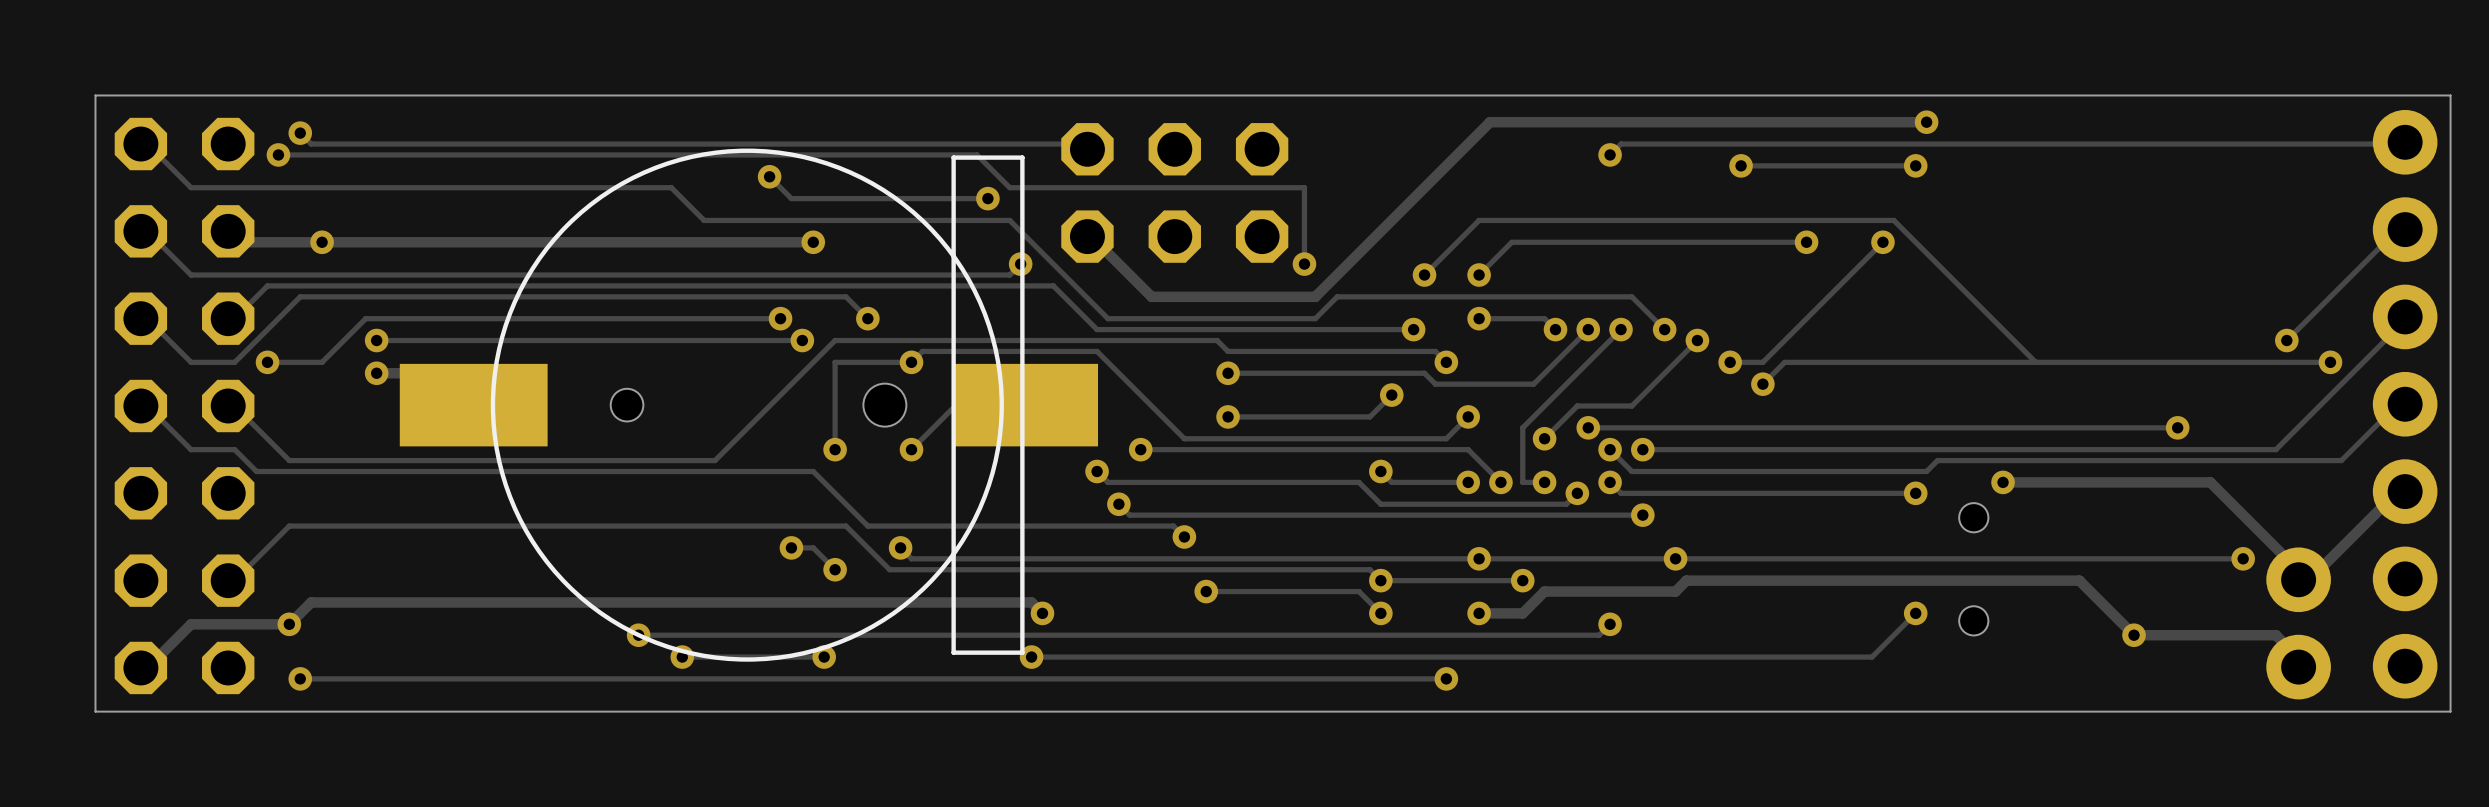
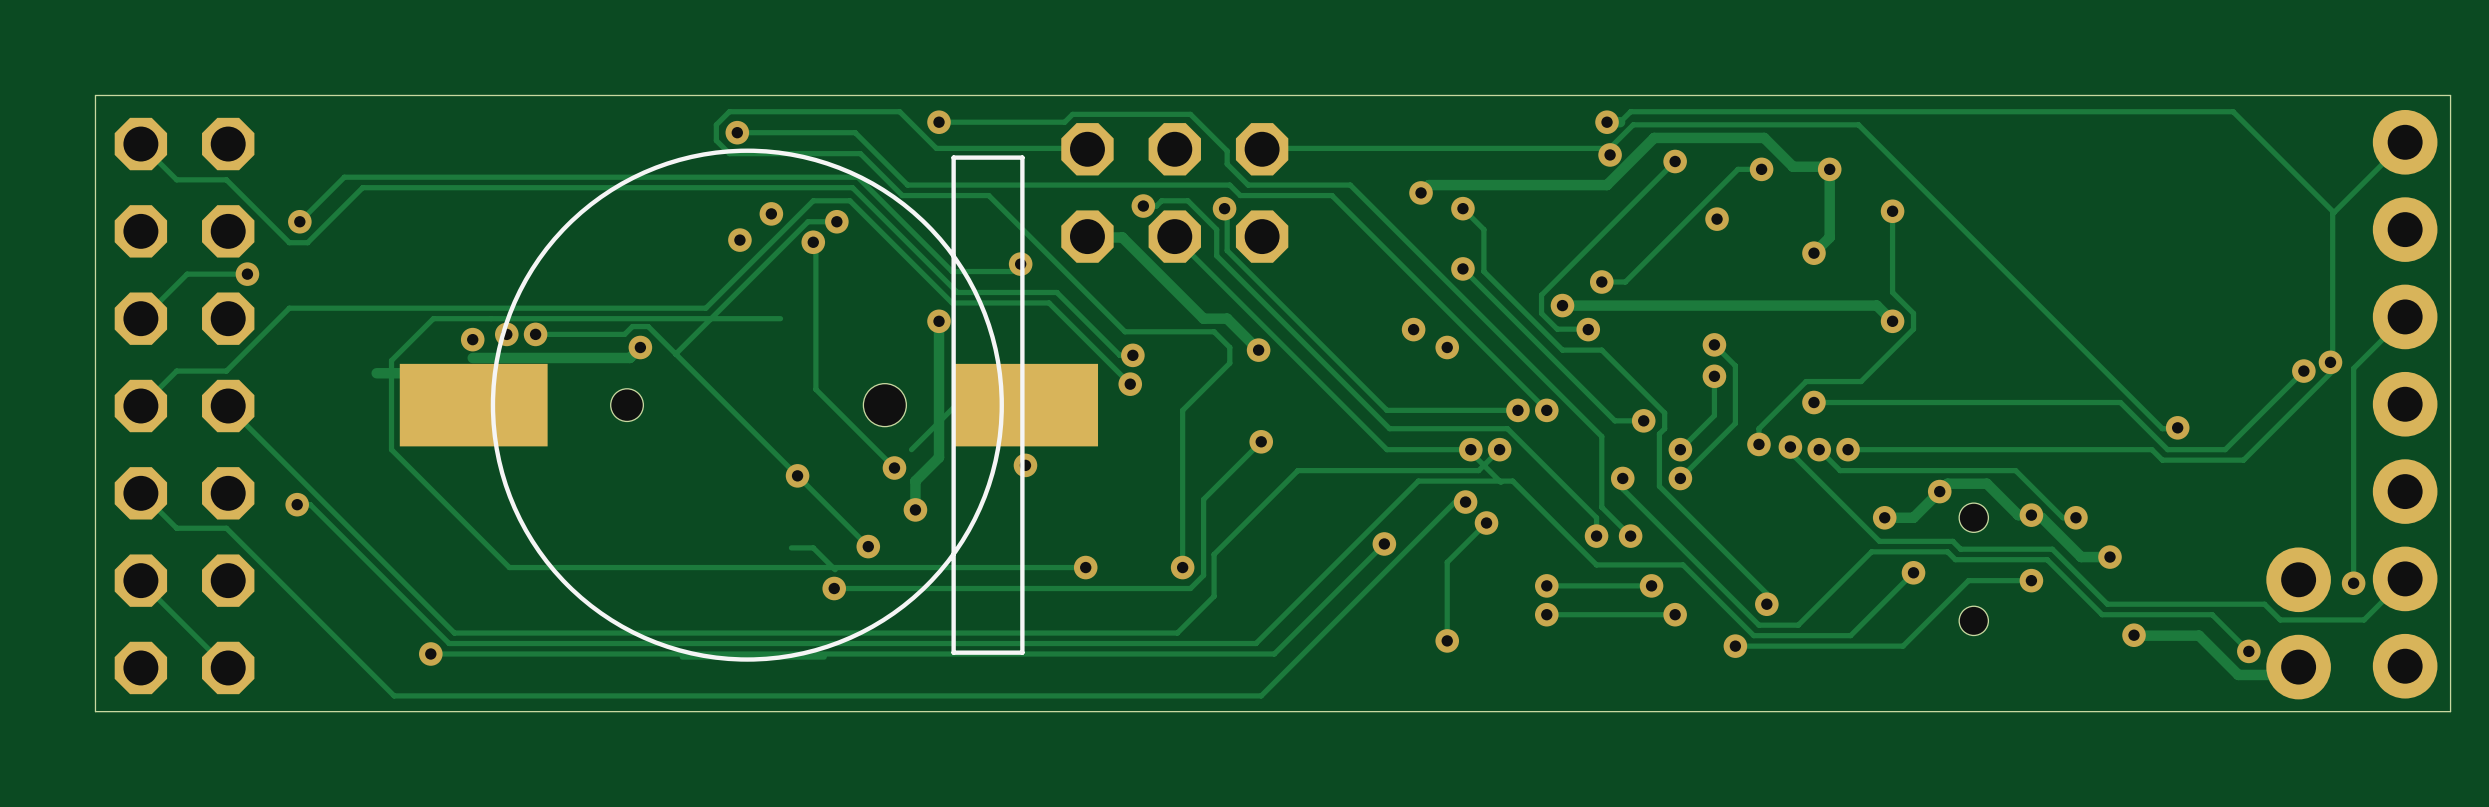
track: none -> (939, 122) (1064, 122) (1072, 114) (1190, 114) (1227, 151) (1227, 164) (1248, 185) (1350, 185) (1601, 436) (1601, 507) (1630, 536)
via: none -> (939, 122)
track: (1607, 122) (1490, 122) (1315, 296) (1151, 296) (1097, 242) (1087, 236) -> (1203, 318) (1122, 237) (1087, 236)
via: none -> (1607, 122)
track: (1926, 122) (1620, 122) -> (2333, 212) (2233, 111) (1630, 111) (1620, 122)
via: (1926, 122) -> none
track: none -> (737, 132) (855, 132) (907, 185) (1229, 185) (1240, 195) (1331, 195) (1546, 410)
via: none -> (737, 132)
track: (300, 133) (311, 144) (1086, 144) (1087, 149) -> (1182, 567) (1182, 410) (1229, 363) (1229, 347) (1214, 331) (1125, 331) (988, 195) (902, 195) (860, 153) (729, 153) (716, 140) (716, 124) (729, 111) (899, 111) (936, 148) (1087, 149)
via: (300, 133) -> none
track: (2405, 142) (2395, 144) (1621, 144) (1610, 154) -> (2405, 142) (2332, 213) (2332, 371) (2243, 460) (2162, 460) (2151, 449)
track: (140, 144) (147, 144) (191, 187) (362, 187) -> (140, 144) (176, 179) (226, 179) (289, 242) (307, 242) (362, 187)
track: none -> (1262, 149) (1609, 148) (1633, 124) (1858, 124) (2162, 428) (2175, 428)
track: (278, 154) (977, 154) (1009, 187) (1304, 187) (1304, 264) -> none
via: (278, 154) -> none
track: none -> (1675, 161) (1541, 295) (1541, 313) (1557, 329) (1596, 329)
via: none -> (1675, 161)
via position: (1741, 165) -> (1761, 169)
track: (1915, 165) (1741, 165) -> none
via: (1915, 165) -> none
track: none -> (1761, 169) (1738, 169) (1625, 282) (1601, 282)
via: none -> (1829, 169)
track: (769, 176) (791, 198) (987, 198) -> none
via: (769, 176) -> none
track: (671, 187) (704, 220) (1009, 220) (1107, 318) (1203, 318) -> (671, 187) (852, 187) (957, 292) (1056, 292) (1119, 355) (1132, 355)
track: none -> (1421, 192) (1428, 185) (1607, 185) (1654, 137) (1764, 137) (1793, 166) (1827, 166) (1829, 169) (1829, 237) (1813, 253)
via: none -> (1421, 192)
via: (987, 198) -> none
track: none -> (1143, 206) (1156, 206) (1161, 200) (1187, 200) (1216, 229) (1216, 255) (1389, 428) (1507, 428) (1596, 517) (1596, 536)
via: none -> (1143, 206)
track: none -> (1224, 208) (1227, 211) (1227, 250) (1386, 410) (1517, 410)
via: none -> (1224, 208)
track: none -> (1462, 208) (1483, 229) (1483, 271) (1562, 350) (1601, 350) (1664, 412) (1664, 428) (1659, 433) (1659, 486) (1766, 593) (1766, 604)
via: none -> (1462, 208)
track: none -> (1892, 211) (1892, 292) (1913, 313) (1913, 329) (1861, 381) (1806, 381) (1758, 428) (1758, 444)
via: none -> (1892, 211)
via: none -> (771, 213)
via: none -> (1717, 219)
track: none -> (299, 221) (344, 177) (857, 177) (952, 271) (1012, 271)
track: none -> (836, 221) (808, 221) (675, 354)
via: none -> (836, 221)
track: (2405, 229) (2395, 231) (2286, 340) -> none
track: (140, 231) (147, 231) (191, 275) (1009, 275) (1020, 264) -> none
track: (228, 231) (234, 231) (245, 242) (813, 242) -> none
via: none -> (739, 240)
via position: (322, 242) -> (299, 221)
track: none -> (815, 242) (815, 389) (894, 468)
track: (1806, 242) (1511, 242) (1479, 275) -> none
via position: (1806, 242) -> (1813, 253)
track: (1882, 242) (1762, 362) (1730, 362) -> none
via: (1882, 242) -> none
via: (1304, 264) -> none
track: none -> (1462, 268) (1614, 420) (1643, 420)
via: none -> (247, 274)
track: (1424, 275) (1479, 220) (1893, 220) (2035, 362) -> none
via: (1424, 275) -> none
via position: (1479, 275) -> (1462, 268)
via: none -> (1601, 282)
track: none -> (1562, 305) (1876, 305) (1892, 321)
track: (2405, 316) (2406, 318) (2275, 449) (2225, 449) -> (2303, 371) (2225, 449)
track: none -> (2405, 316) (2353, 368) (2353, 583)
track: (228, 318) (234, 318) (267, 285) (1053, 285) (1097, 329) (1413, 329) -> none
track: (433, 318) (365, 318) (322, 362) (267, 362) -> (433, 318) (391, 360) (391, 449) (509, 567) (1085, 567)
via: (780, 318) -> none
track: (867, 318) (846, 296) (300, 296) (234, 362) (191, 362) (147, 318) (142, 318) -> (247, 274) (187, 274) (142, 318)
via: (867, 318) -> none
track: (1227, 318) (1315, 318) (1337, 296) (1631, 296) (1664, 329) -> (1227, 318) (1258, 350)
track width: thin (1227, 318) (1203, 318) -> thick (1227, 318) (1203, 318)
track: (1479, 318) (1544, 318) (1555, 329) -> none
via: (1479, 318) -> none
track: none -> (939, 321) (939, 457) (915, 481) (915, 509)
via: none -> (939, 321)
via: none -> (1892, 321)
via position: (1555, 329) -> (1562, 305)
track: (1588, 329) (1533, 384) (1435, 384) (1424, 373) (1228, 373) -> none
track: (1621, 329) (1522, 427) (1522, 482) (1544, 482) -> none
via: (1621, 329) -> none
via: (1664, 329) -> none
via: none -> (506, 334)
track: none -> (535, 334) (624, 334) (632, 326) (648, 326) (868, 546)
via: none -> (535, 334)
via: none -> (472, 339)
via: (376, 340) -> none
track: (802, 340) (376, 340) -> none
via: (802, 340) -> none
track: (1697, 340) (1631, 406) (1577, 406) (1544, 438) -> none
via: (1697, 340) -> none
via position: (2286, 340) -> (2303, 371)
track: none -> (1714, 344) (1735, 365) (1735, 423) (1680, 478)
via: none -> (1714, 344)
track: none -> (640, 347) (629, 357) (472, 357)
via: none -> (640, 347)
via: none -> (1258, 350)
via: none -> (1132, 355)
via: (267, 362) -> none
via: (911, 362) -> none
track: (1446, 362) (1435, 351) (1228, 351) (1217, 340) (835, 340) (715, 460) (289, 460) (234, 406) (228, 406) -> (1499, 449) (1478, 470) (1297, 470) (1214, 554) (1214, 596) (1177, 633) (454, 633) (228, 406)
via position: (1446, 362) -> (1447, 347)
via: (1730, 362) -> none
track: (2330, 362) (1784, 362) (1762, 384) -> none
via: (376, 373) -> none
via: (1228, 373) -> none
track: none -> (1714, 376) (1714, 415) (1680, 449)
via: none -> (1714, 376)
via: none -> (1130, 384)
via: (1762, 384) -> none
track: (1391, 395) (1369, 416) (1228, 416) -> none
via: (1391, 395) -> none
via: none -> (1813, 402)
track: (2405, 404) (2395, 406) (2341, 460) (1937, 460) (1926, 471) (1631, 471) (1610, 449) -> none
track: (140, 406) (147, 406) (191, 449) (234, 449) (256, 471) (813, 471) (867, 526) (1173, 526) (1184, 536) -> (140, 406) (176, 371) (226, 371) (289, 308) (705, 308) (813, 200) (849, 200) (952, 302) (1049, 302) (1130, 384)
via: none -> (1517, 410)
via: none -> (1546, 410)
via: (1228, 416) -> none
track: (1468, 416) (1446, 438) (1184, 438) (1097, 351) (922, 351) (911, 362) (835, 362) (835, 449) -> none
via: (1468, 416) -> none
via: none -> (1643, 420)
via: (1588, 427) -> none
track: (2177, 427) (1588, 427) -> none
via: (1544, 438) -> none
track: none -> (1261, 441) (1203, 499) (1203, 575) (1190, 588) (834, 588)
via: none -> (1261, 441)
via: none -> (1758, 444)
track: none -> (1790, 447) (1790, 452) (1879, 541) (1952, 541) (1960, 549) (2052, 549) (2107, 604) (2264, 604) (2280, 619) (2364, 619) (2405, 578)
via: none -> (1790, 447)
via: (835, 449) -> none
via position: (911, 449) -> (894, 468)
via: (1140, 449) -> none
track: (1386, 449) (1140, 449) -> (1386, 449) (1174, 236)
via: none -> (1470, 449)
via: none -> (1499, 449)
via: (1610, 449) -> none
via: (1642, 449) -> none
via: none -> (1680, 449)
track: none -> (1819, 449) (1840, 470) (2015, 470) (2062, 517) (2075, 517)
via: none -> (1819, 449)
track: (1848, 449) (1642, 449) -> none
via: none -> (1848, 449)
track: (2167, 449) (2151, 449) -> (2167, 449) (2120, 402) (1813, 402)
via: none -> (1025, 465)
track: (1097, 471) (1107, 482) (1359, 482) (1380, 504) (1566, 504) (1577, 493) -> none
via: (1097, 471) -> none
track: (1380, 471) (1391, 482) (1468, 482) -> none
via: (1380, 471) -> none
via: none -> (797, 475)
track: none -> (1622, 478) (1622, 488) (1758, 625) (1798, 625) (1871, 551) (1947, 551) (1955, 559) (2047, 559) (2102, 614) (2212, 614) (2248, 651)
via: none -> (1680, 478)
via position: (1468, 482) -> (1465, 502)
via: (1500, 482) -> none
via: (1544, 482) -> none
track: (1610, 482) (1621, 493) (1915, 493) -> none
via position: (1610, 482) -> (1622, 478)
track: (2003, 482) (2210, 482) (2297, 569) (2298, 579) (2308, 569) (2319, 569) (2395, 493) (2405, 491) -> none
via: (2003, 482) -> none
via: none -> (1939, 491)
track: none -> (140, 493) (176, 528) (226, 528) (394, 695) (1261, 695) (1455, 502) (1465, 502)
via: (1577, 493) -> none
via: (1915, 493) -> none
track: none -> (297, 504) (310, 504) (449, 643) (1255, 643) (1418, 481) (1512, 481) (1596, 564) (1683, 564) (1753, 635) (1850, 635) (1913, 572)
via: none -> (297, 504)
track: (1118, 504) (1129, 515) (1642, 515) -> none
via: (1118, 504) -> none
via: none -> (915, 509)
via position: (1642, 515) -> (1630, 536)
via: none -> (2031, 515)
track: none -> (1884, 517) (1913, 517) (1947, 483) (1986, 483) (2018, 515) (2041, 517) (2081, 557) (2110, 557)
via: none -> (1884, 517)
via: none -> (2075, 517)
track: none -> (1486, 523) (1447, 562) (1447, 640)
via: none -> (1486, 523)
via: (1184, 536) -> none
via: none -> (1596, 536)
track: none -> (1384, 543) (1274, 653) (430, 653)
via: none -> (1384, 543)
via: none -> (868, 546)
via: (791, 547) -> none
track: (900, 547) (911, 558) (2243, 558) -> none
via: (900, 547) -> none
via: none -> (2110, 557)
via: (1479, 558) -> none
via: (1675, 558) -> none
via: (2243, 558) -> none
via: none -> (1085, 567)
via: none -> (1182, 567)
via position: (835, 569) -> (834, 588)
via: none -> (1913, 572)
track: none -> (140, 580) (228, 667)
via: (1380, 580) -> none
track: (1522, 580) (1380, 580) (1369, 569) (889, 569) (846, 526) (289, 526) (234, 580) (228, 580) -> none
via: (1522, 580) -> none
track: (1968, 580) (1686, 580) (1675, 591) (1544, 591) (1522, 613) (1479, 613) -> (1968, 580) (1903, 646) (1735, 646)
track: (2031, 580) (2079, 580) (2134, 635) (2275, 635) (2297, 657) (2298, 667) -> (2141, 635) (2199, 635) (2238, 674) (2290, 674) (2298, 667)
track width: thick (2031, 580) (1968, 580) -> thin (2031, 580) (1968, 580)
via: none -> (2031, 580)
via: none -> (2353, 583)
via: none -> (1546, 585)
track: none -> (1651, 585) (1546, 585)
via: none -> (1651, 585)
track: (1206, 591) (1359, 591) (1380, 613) -> none
via: (1206, 591) -> none
via: none -> (1766, 604)
track: (1042, 613) (1031, 602) (311, 602) (289, 624) (191, 624) (147, 667) (140, 667) -> none
via: (1042, 613) -> none
via: (1380, 613) -> none
via: (1479, 613) -> none
track: (1915, 613) (1872, 657) (1031, 657) -> none
via: (1915, 613) -> none
via: none -> (1546, 614)
track: none -> (1675, 614) (1546, 614)
via: none -> (1675, 614)
via: (289, 624) -> none
track: (1610, 624) (1599, 635) (638, 635) -> none
via: (1610, 624) -> none
via: (638, 635) -> none
via: none -> (1447, 640)
via: none -> (1735, 646)
via: none -> (2248, 651)
via: none -> (430, 653)
via: (682, 657) -> none
via: (824, 657) -> none
via: (1031, 657) -> none
via: (300, 678) -> none
track: (1446, 678) (300, 678) -> none
via: (1446, 678) -> none

